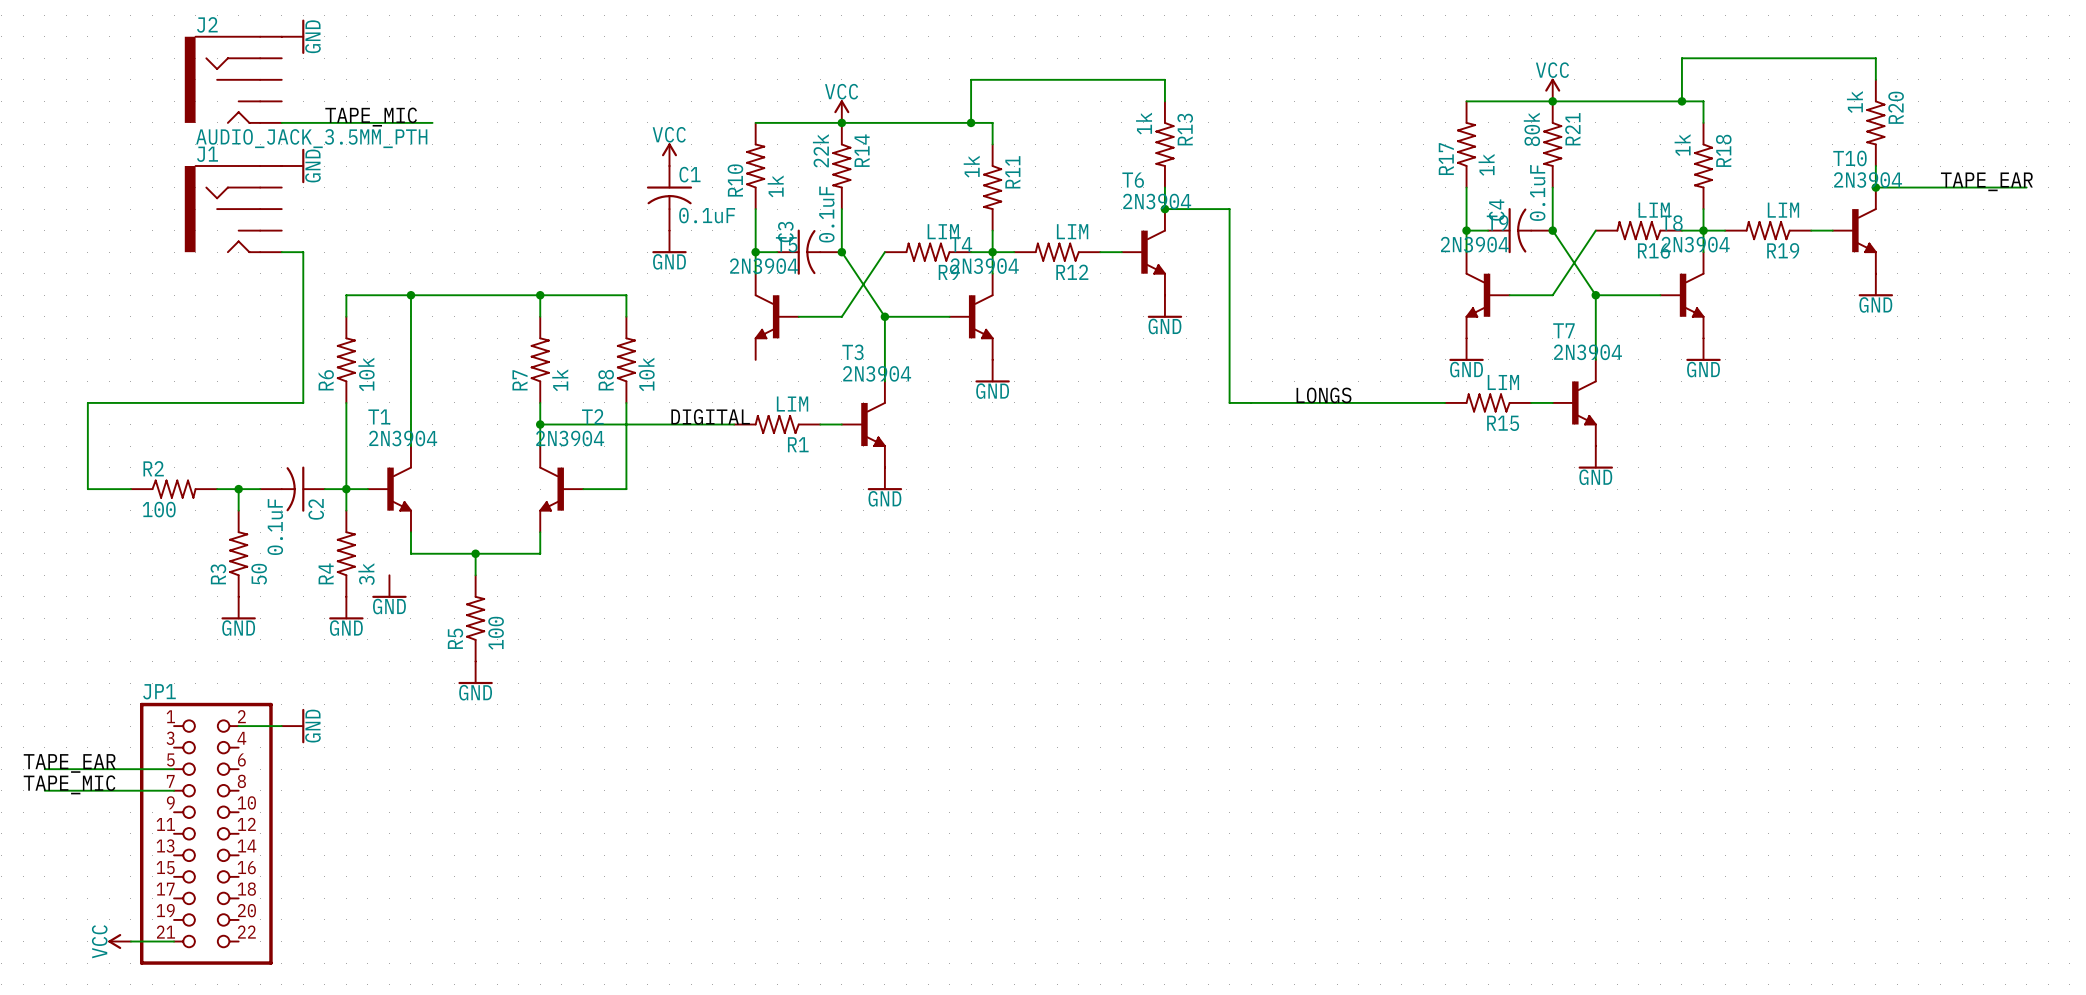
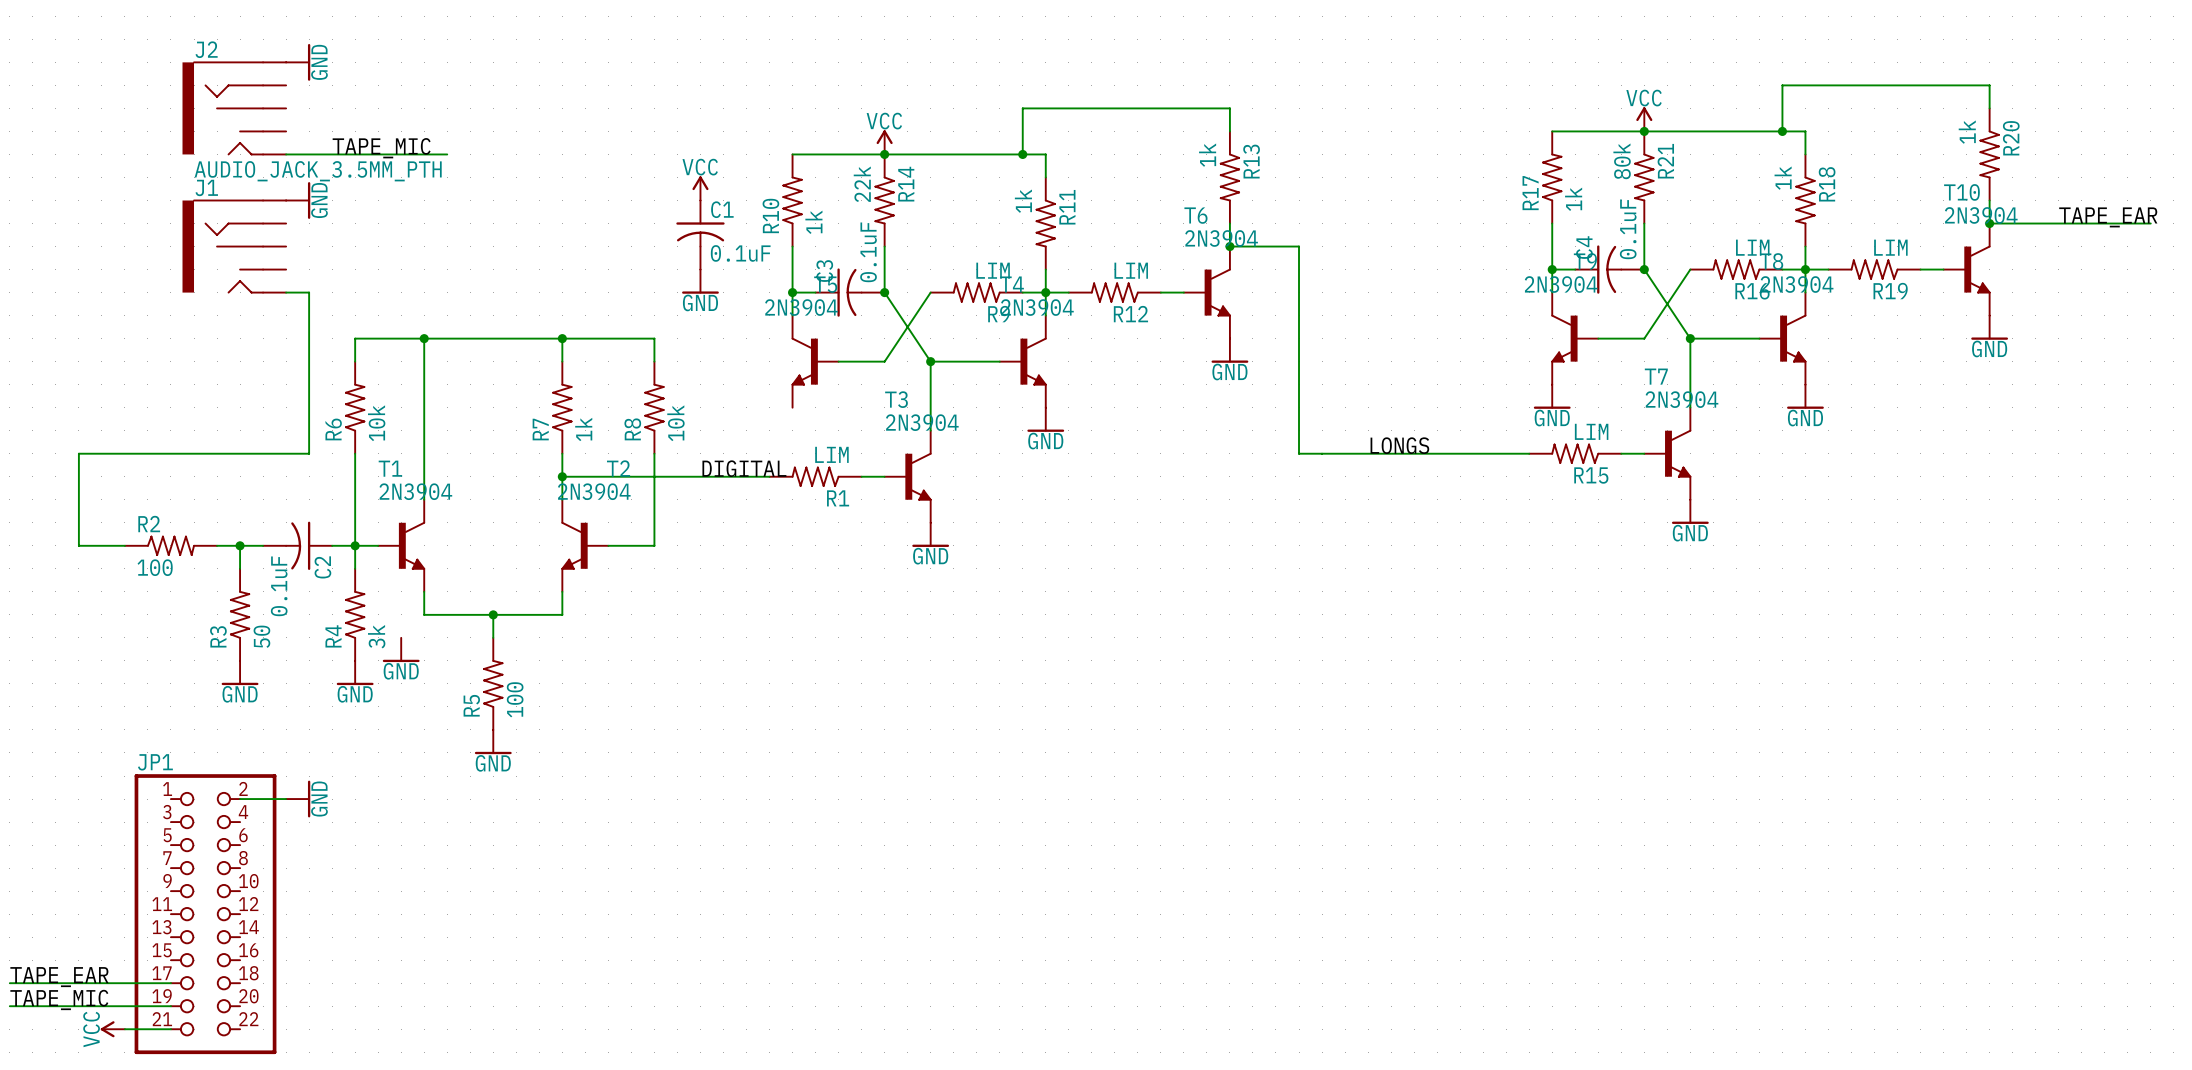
label position: TAPE_EAR (69, 763) -> TAPE_EAR (59, 977)
wire: (44, 769) (174, 769) -> none
label position: TAPE_MIC (69, 784) -> TAPE_MIC (59, 999)
wire: (44, 790) (174, 790) -> none
wire: none -> (9, 983) (170, 983)
wire: none -> (9, 1006) (170, 1006)

